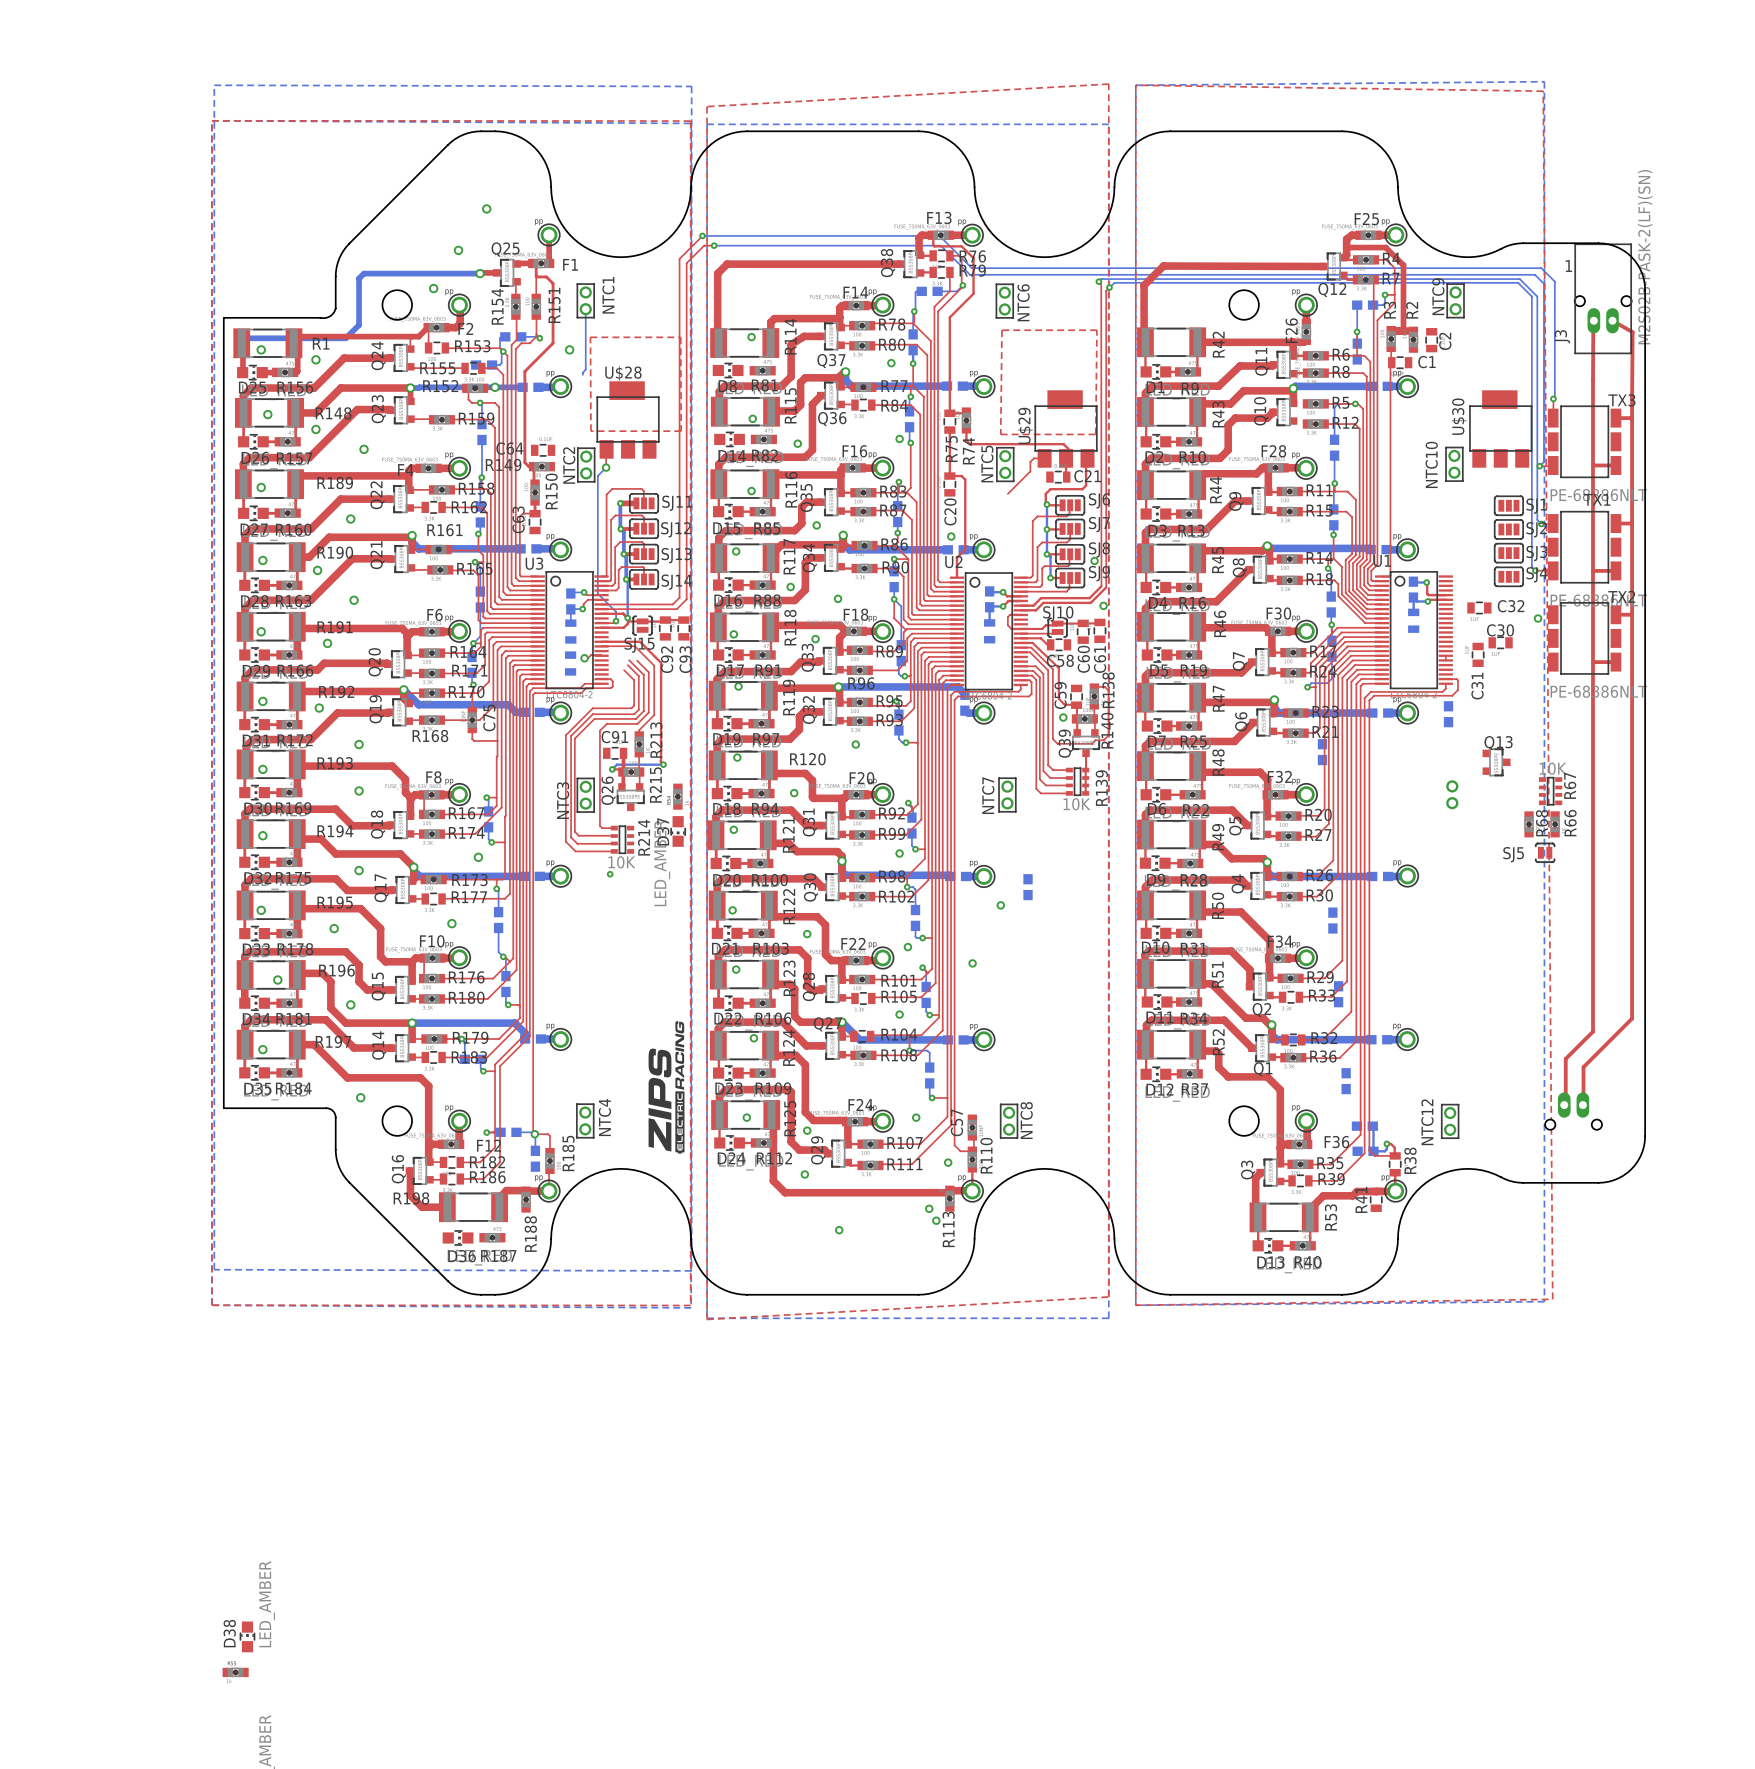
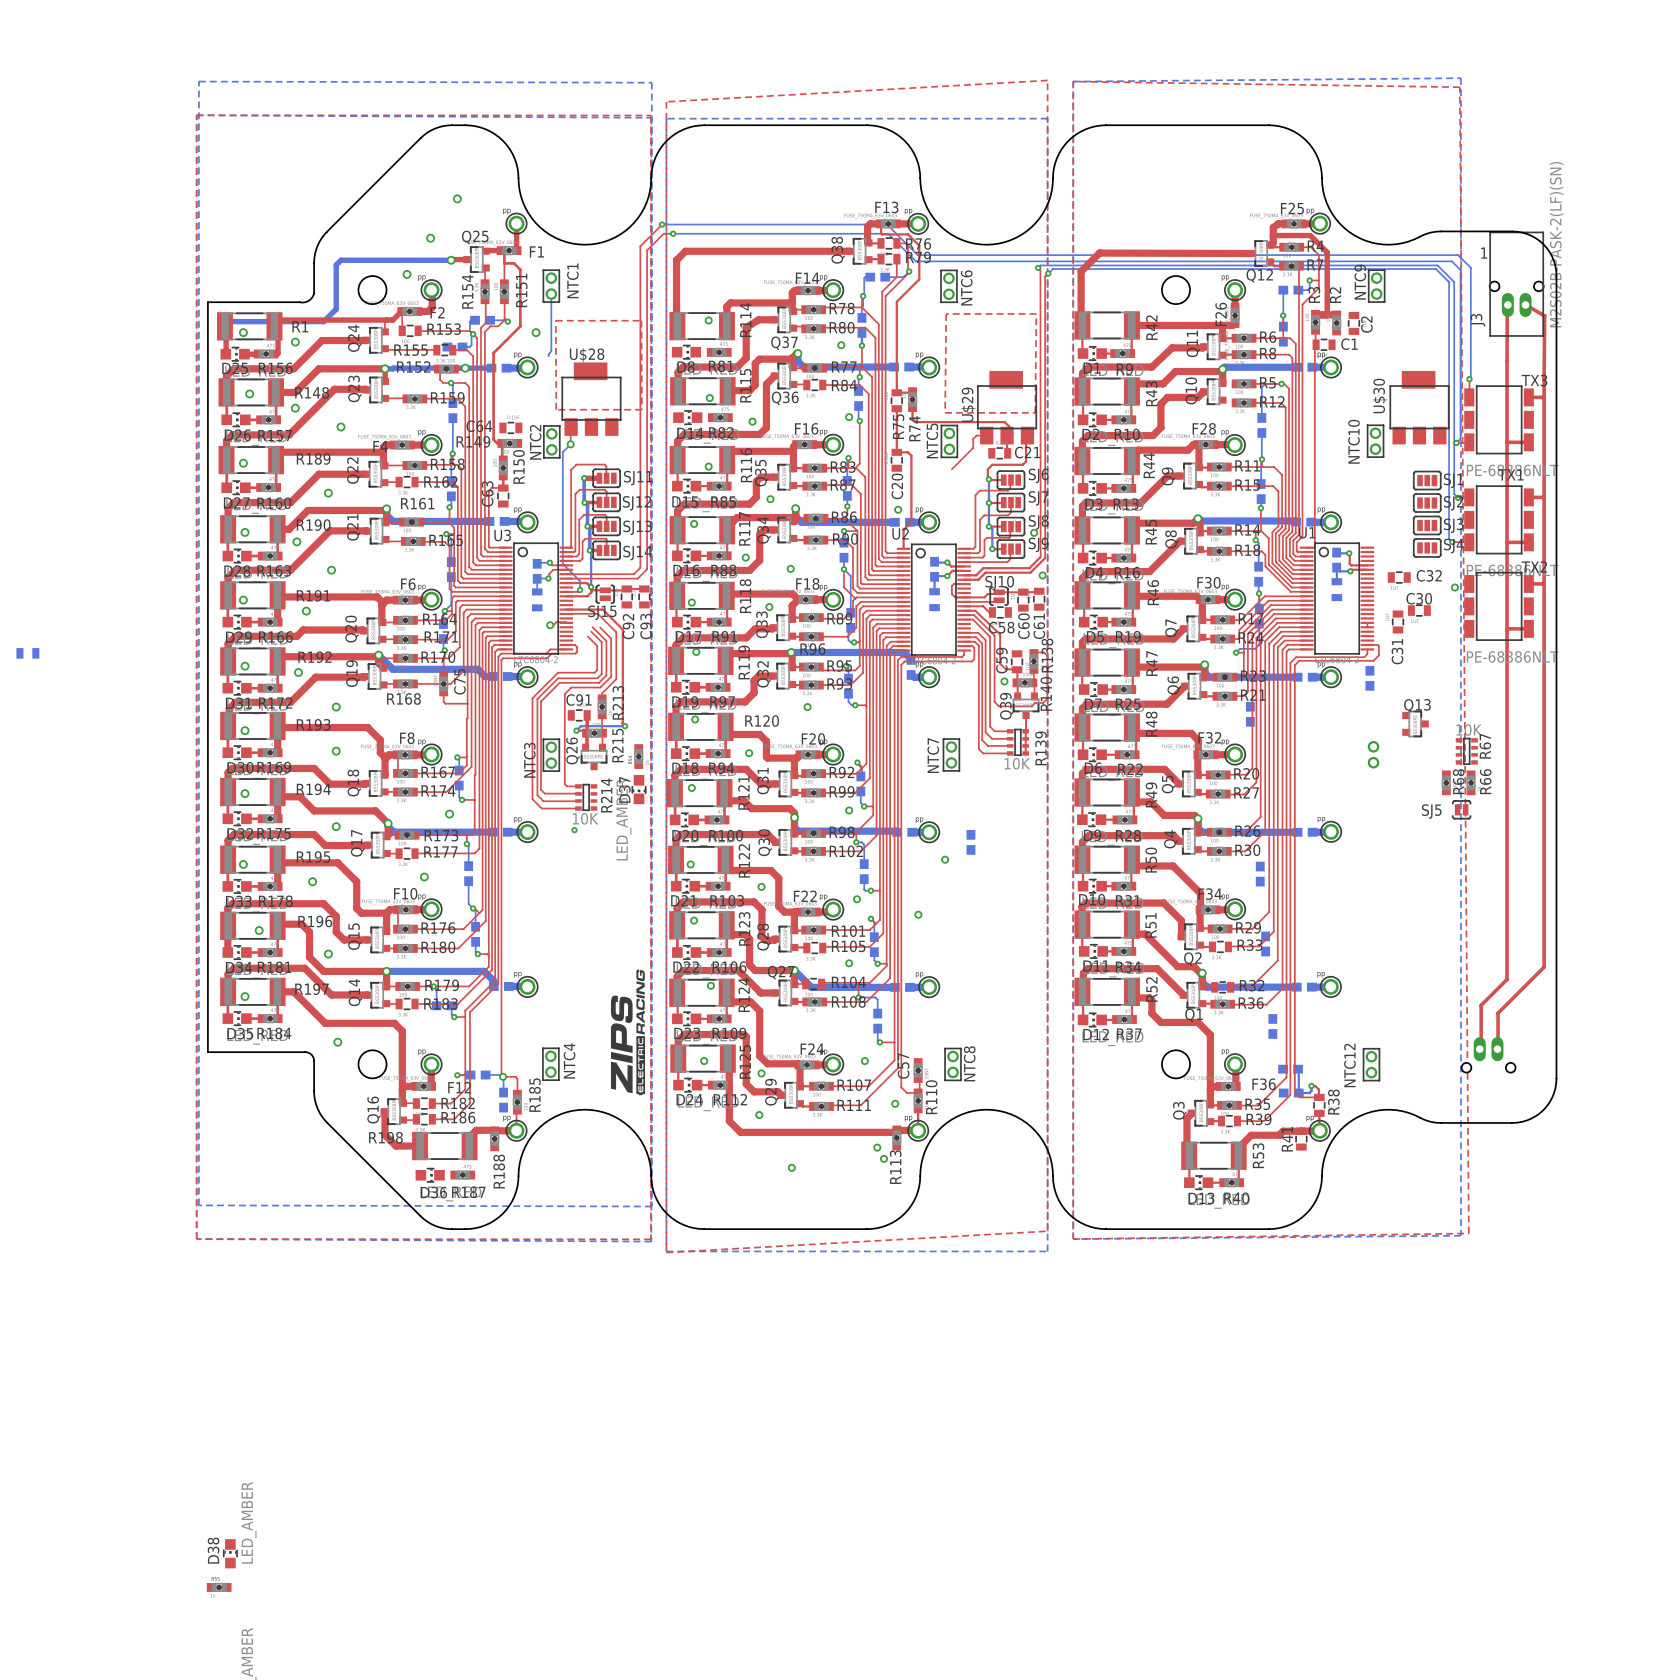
part: (570, 663) -> none
part: none -> (27, 653)

